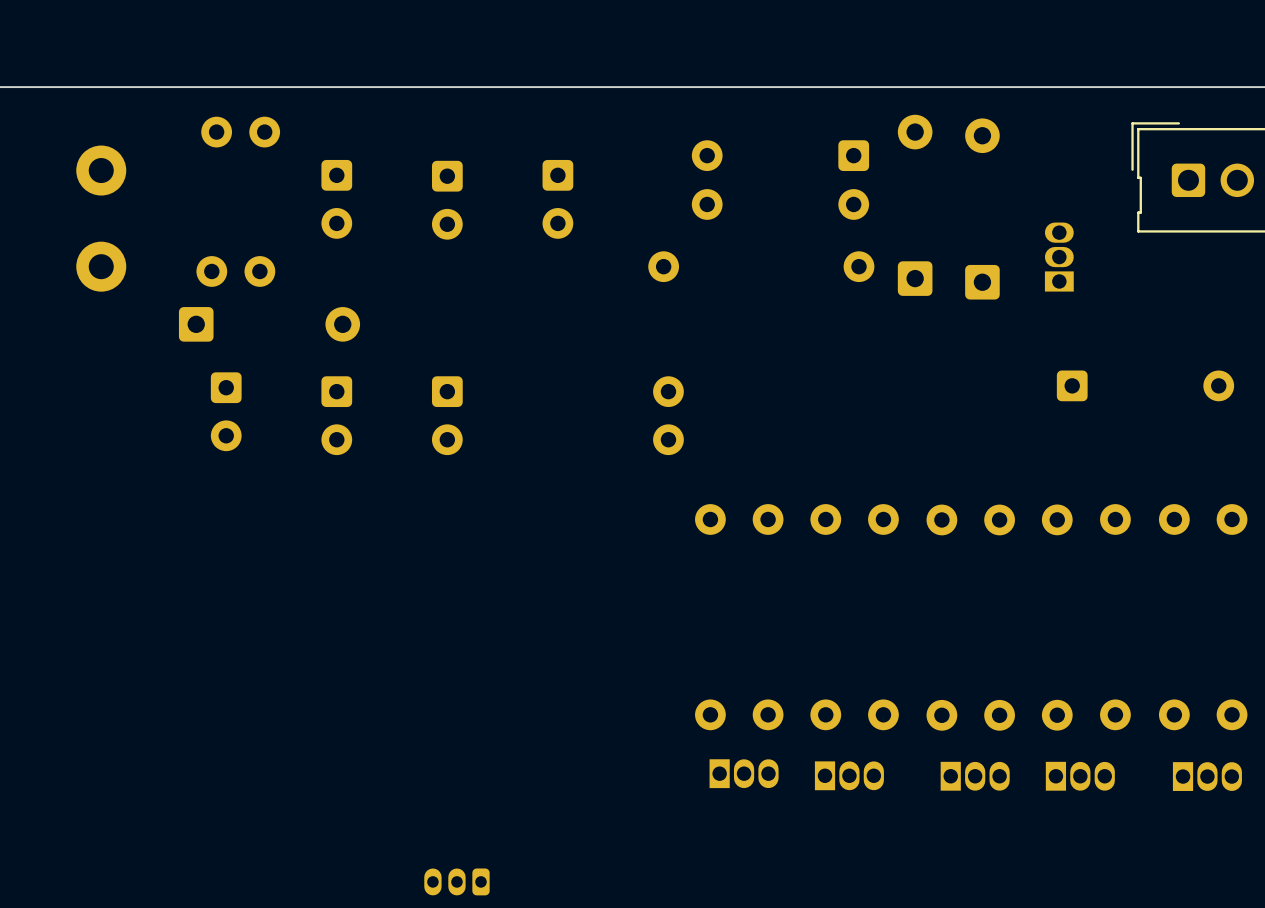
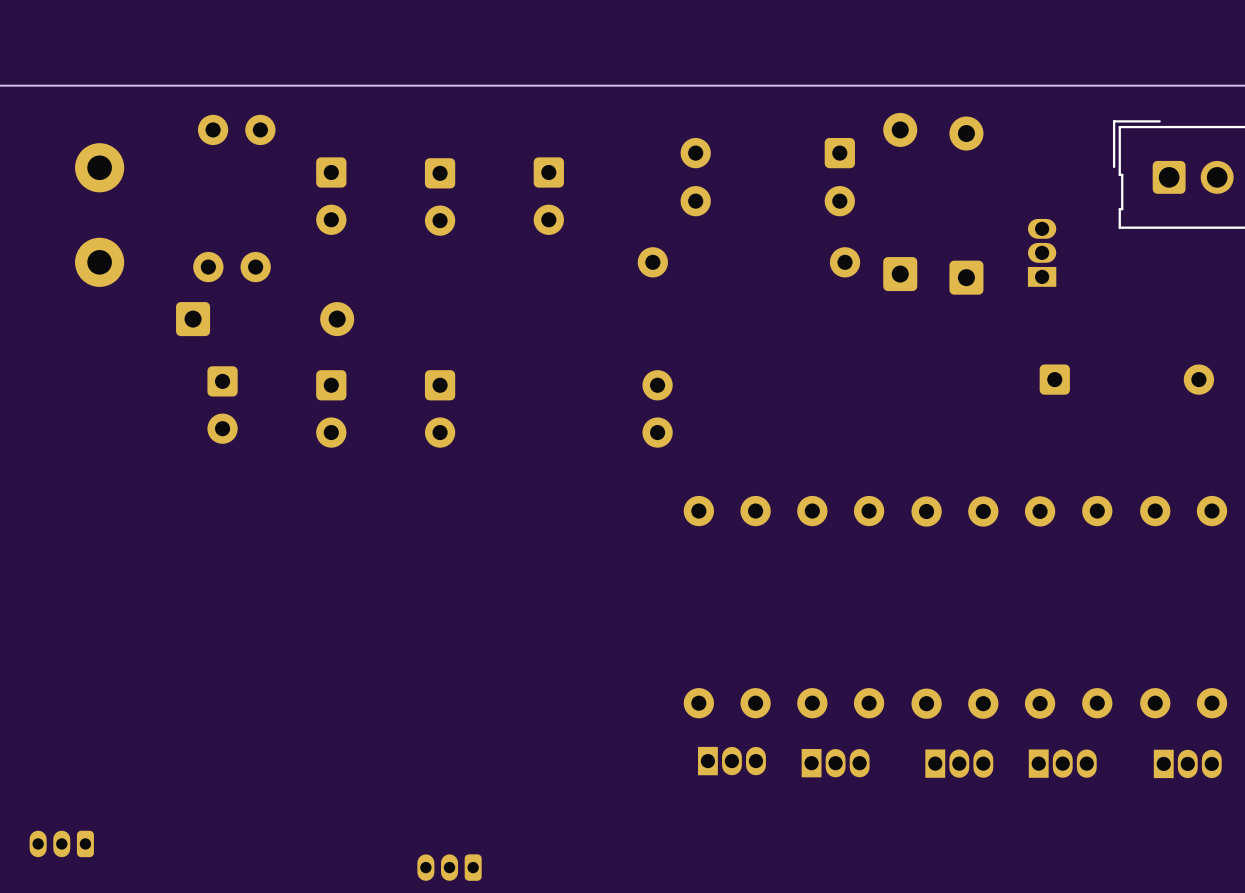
part: none -> (61, 843)

